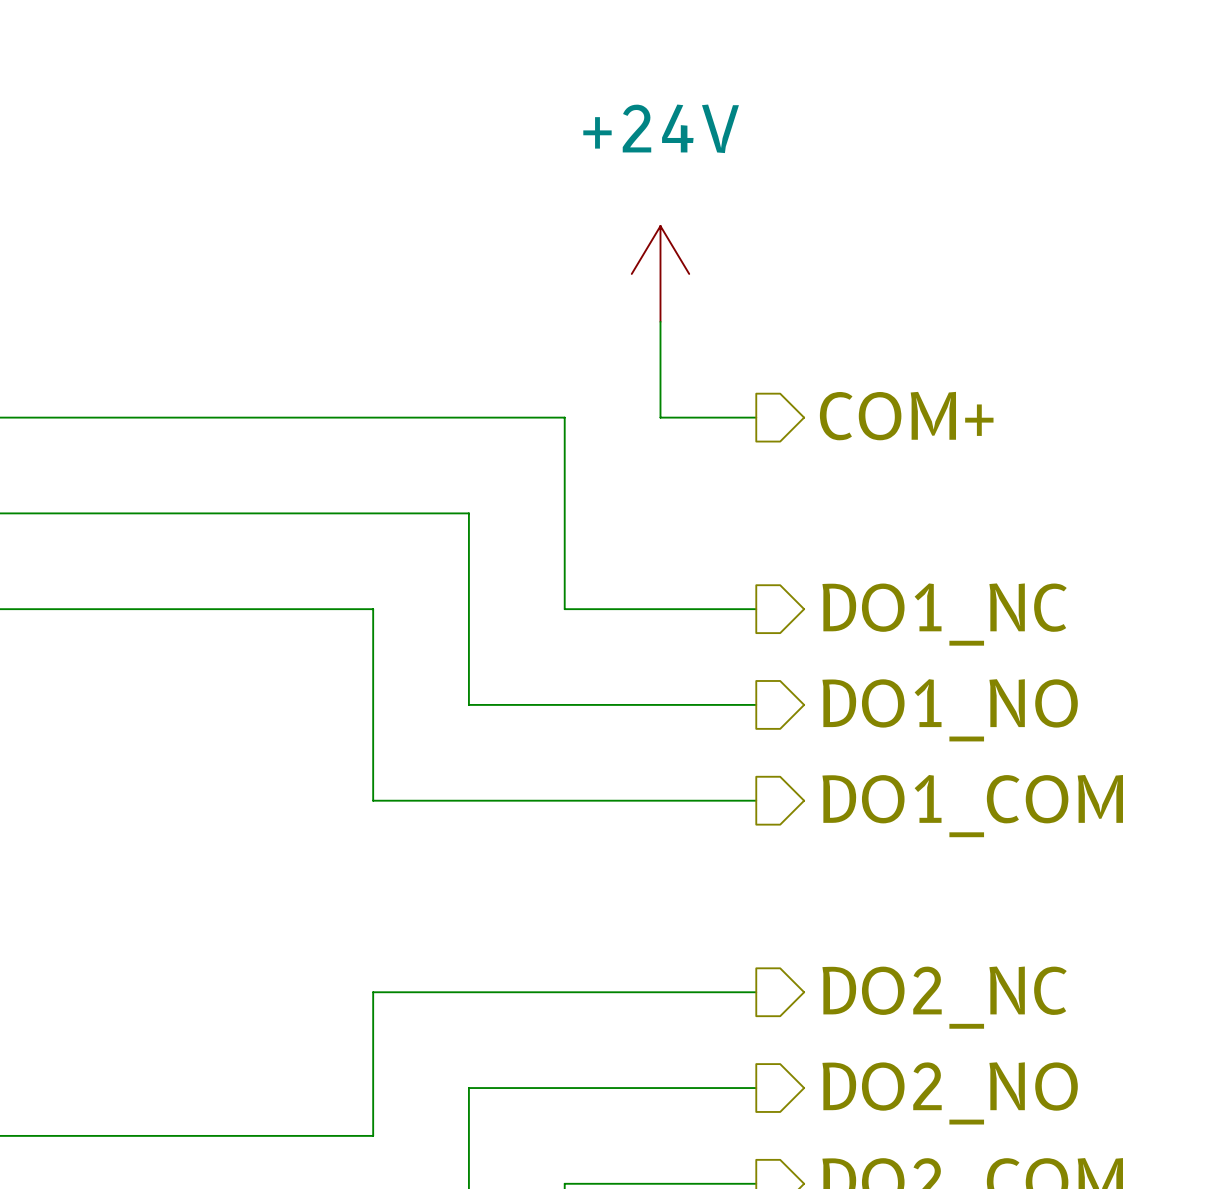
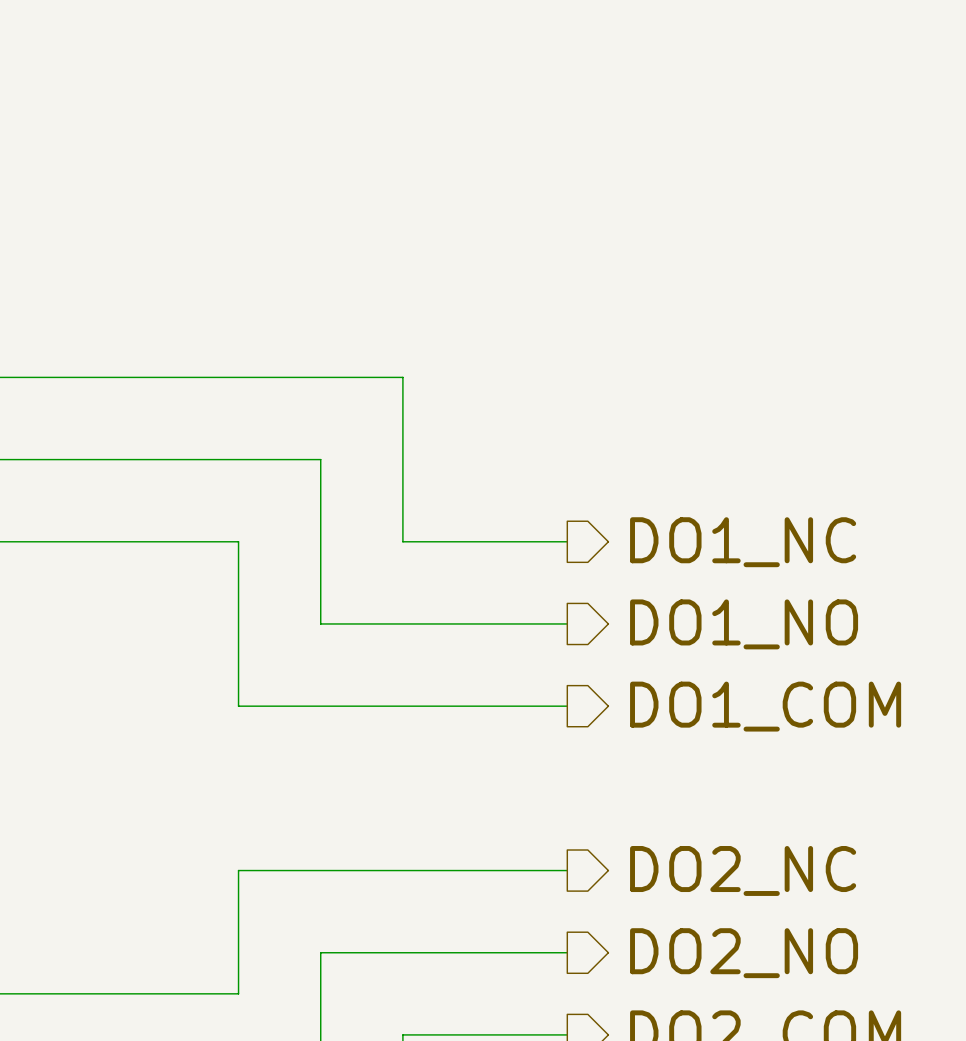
power symbol: +24V (660, 273) -> none
wire: (660, 321) (660, 417) (756, 417) -> none
hierarchical label: COM+ (906, 416) -> none

